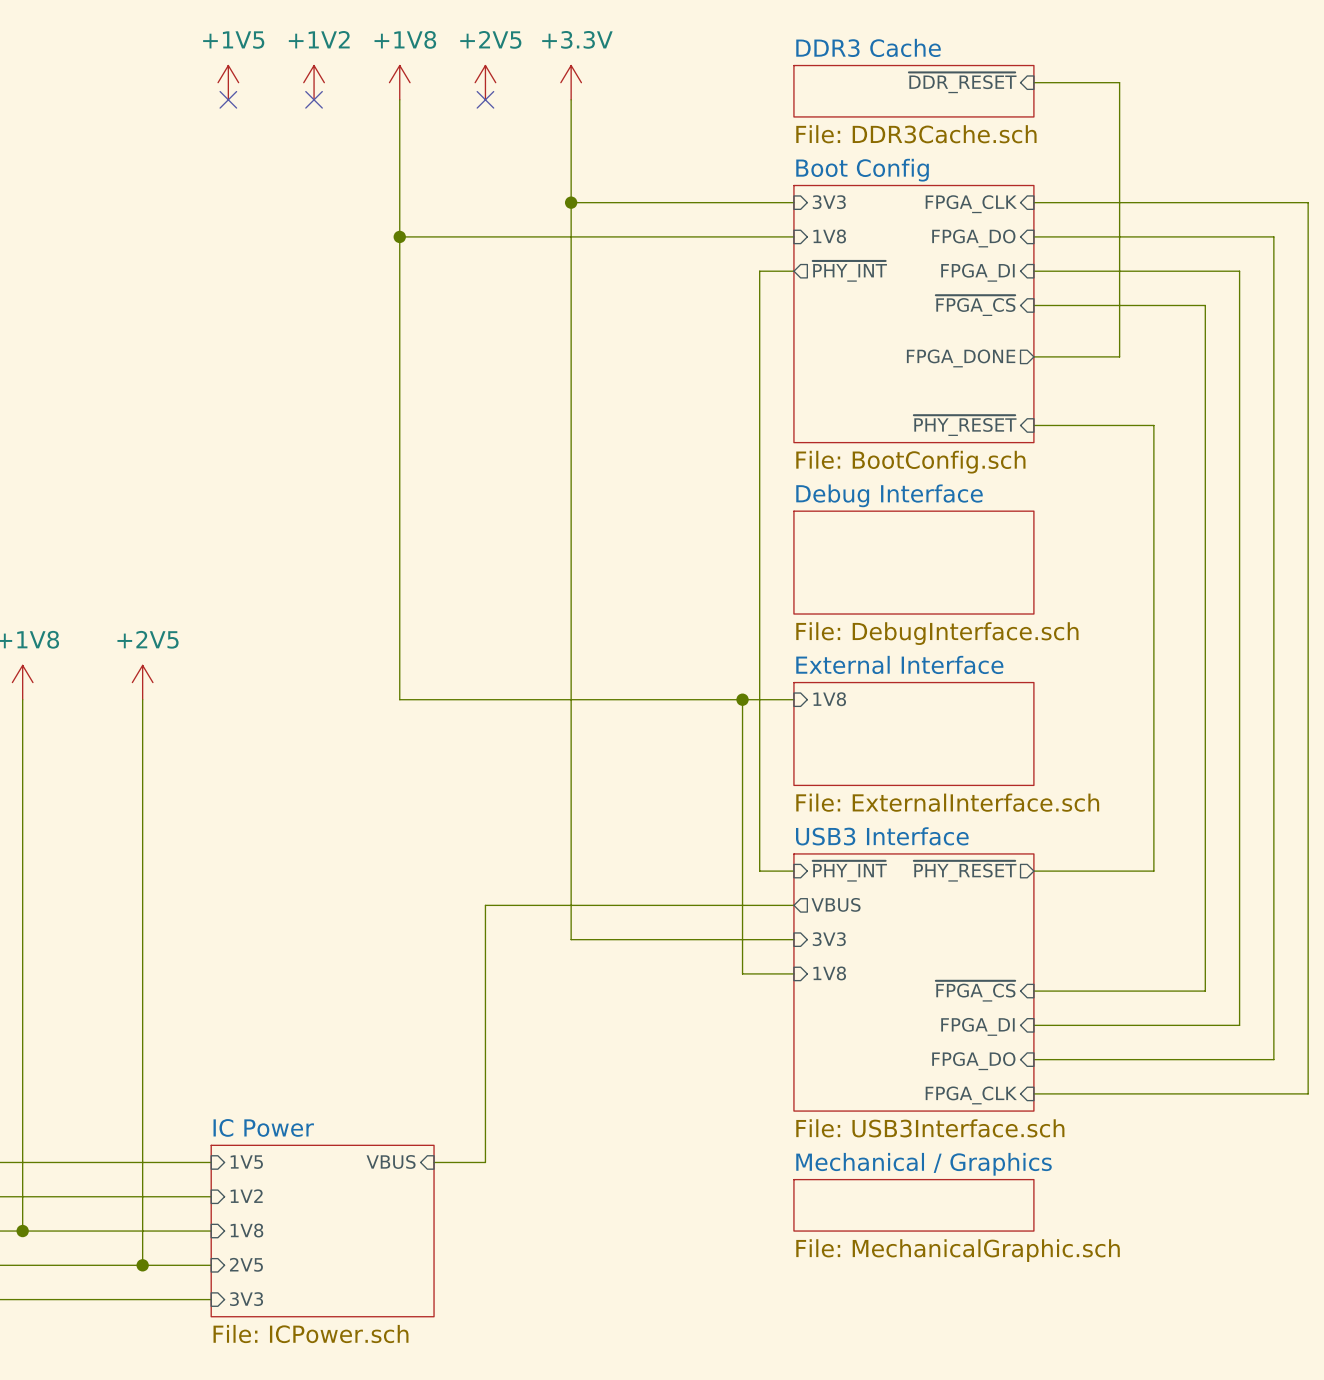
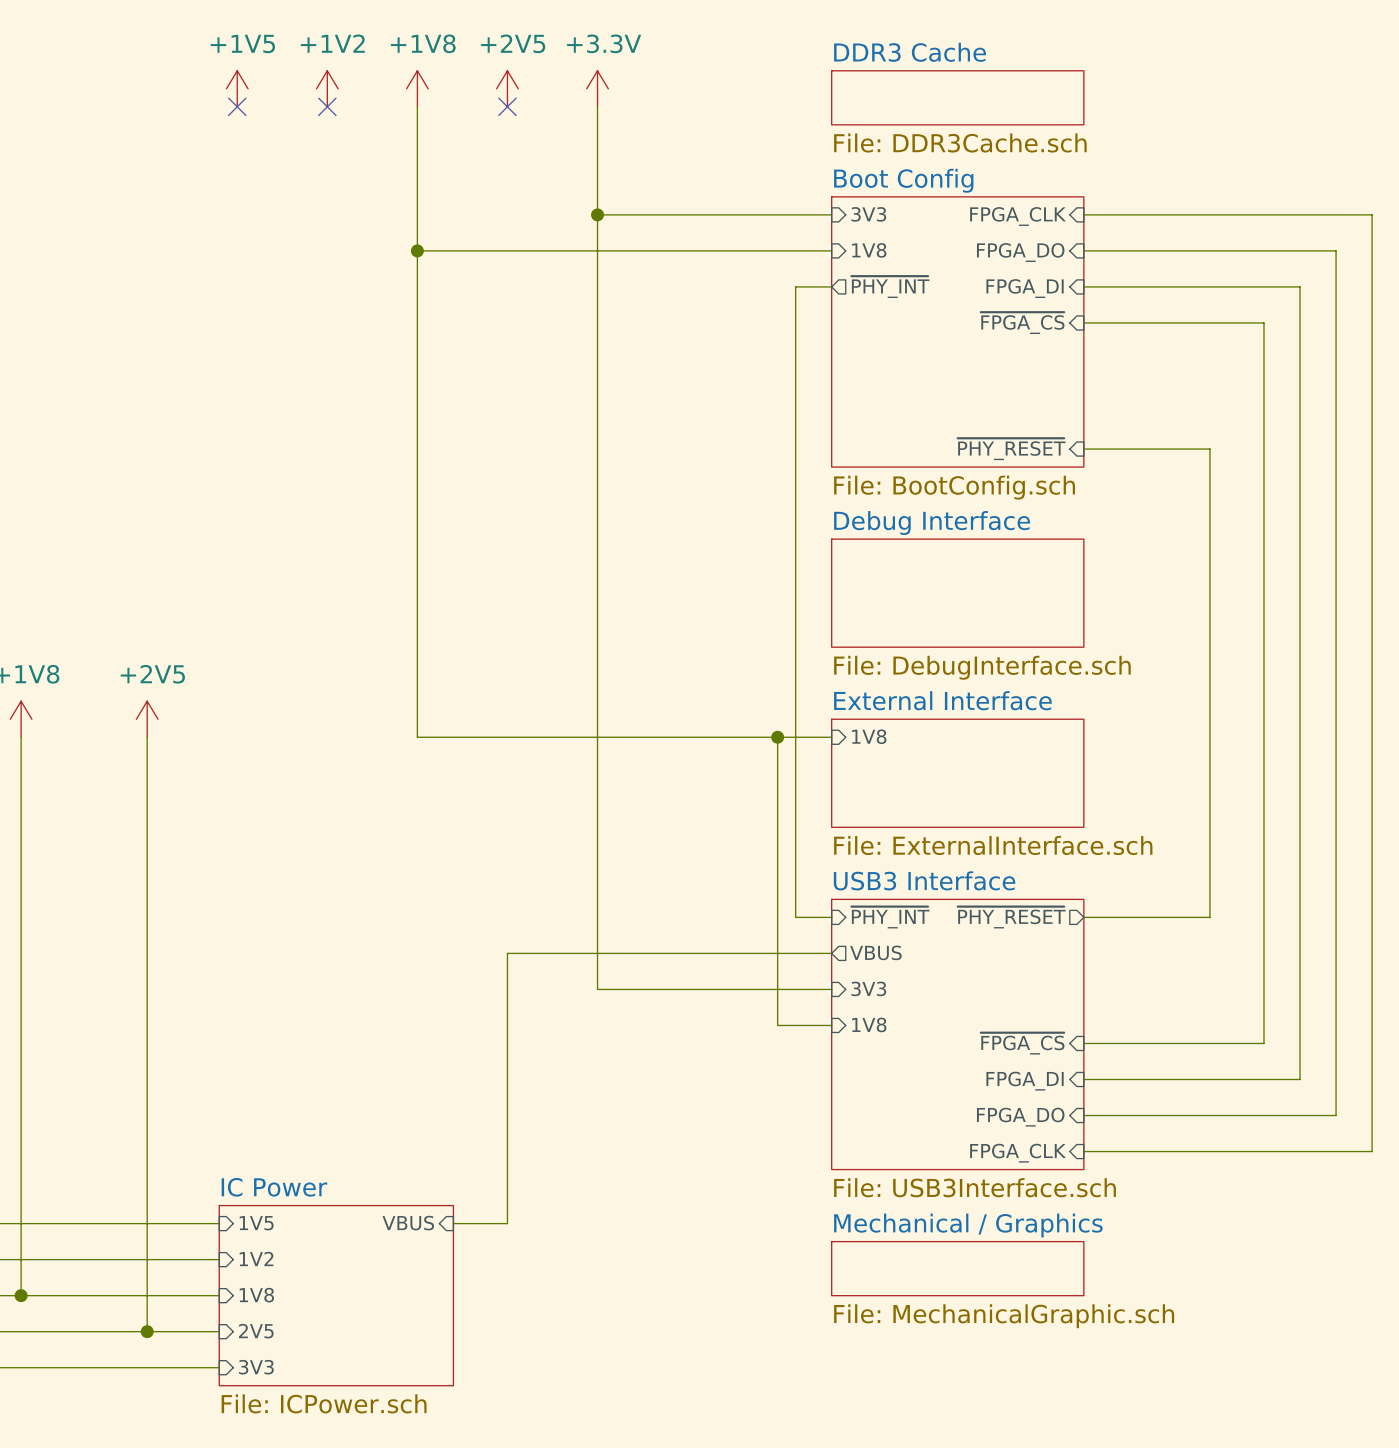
sheet pin: ~{DDR_RESET} (962, 82) -> none
wire: (1033, 82) (1119, 82) (1119, 356) (1033, 356) -> none
sheet pin: FPGA_DONE (961, 358) -> none

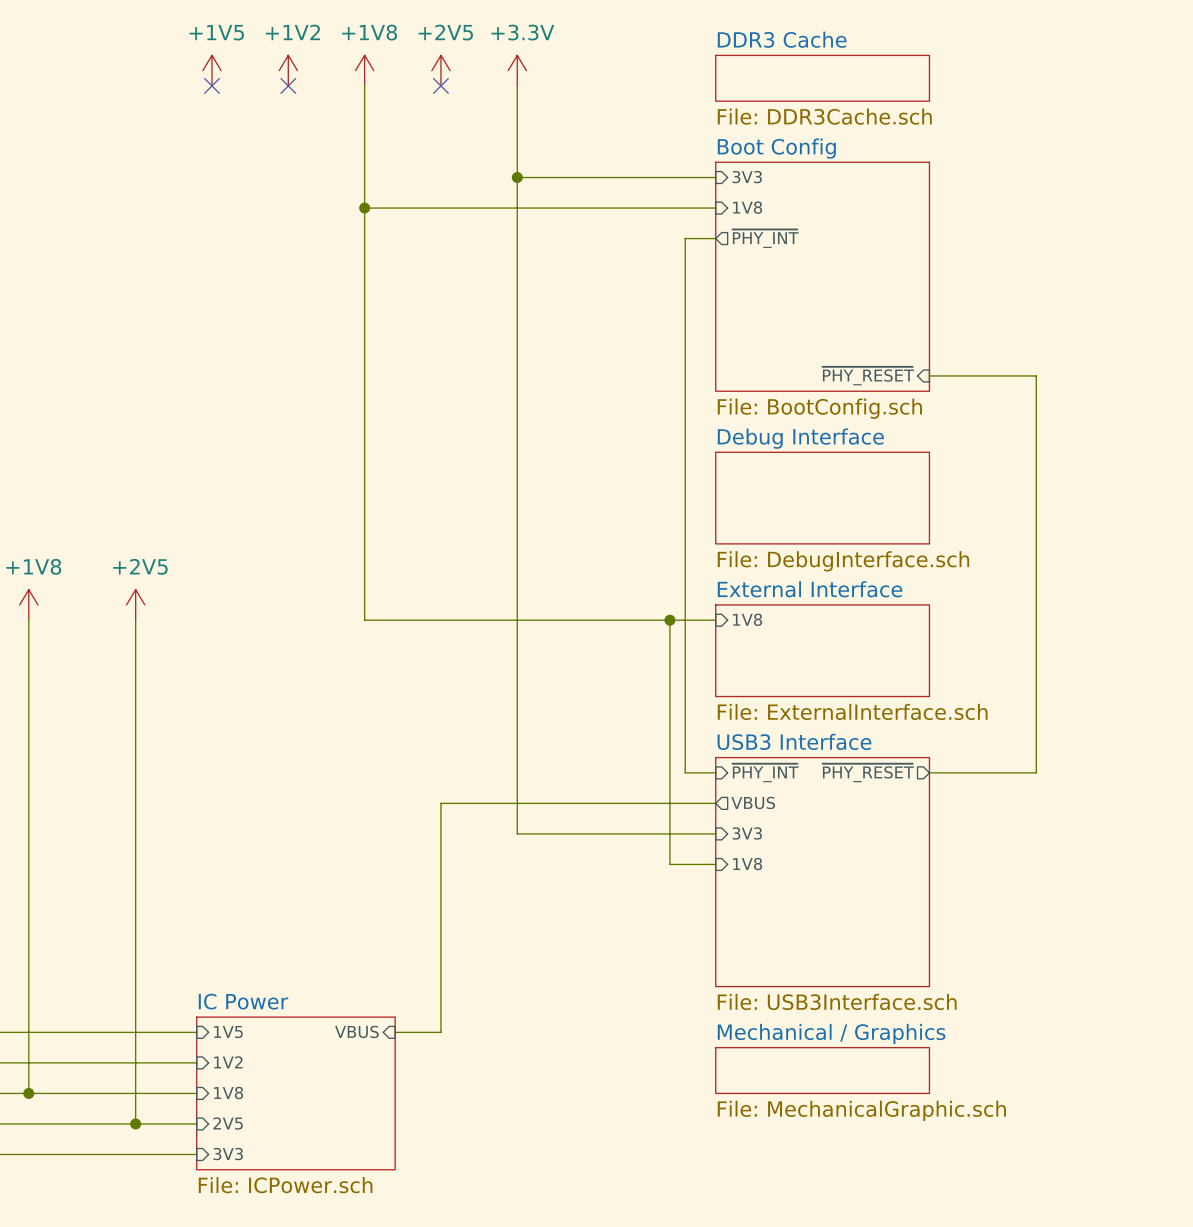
wire: (1083, 214) (1372, 214) (1372, 1151) (1083, 1151) -> none
sheet pin: FPGA_CLK (1018, 216) -> none
wire: (1083, 250) (1336, 250) (1336, 1115) (1083, 1115) -> none
sheet pin: FPGA_DO (1020, 252) -> none
wire: (1083, 286) (1300, 286) (1300, 1079) (1083, 1079) -> none
sheet pin: FPGA_DI (1025, 288) -> none
wire: (1083, 322) (1263, 322) (1263, 1043) (1083, 1043) -> none
sheet pin: ~{FPGA_CS} (1022, 323) -> none
sheet pin: ~{FPGA_CS} (1022, 1043) -> none
sheet pin: FPGA_DI (1025, 1081) -> none
sheet pin: FPGA_DO (1020, 1117) -> none
sheet pin: FPGA_CLK (1018, 1153) -> none

